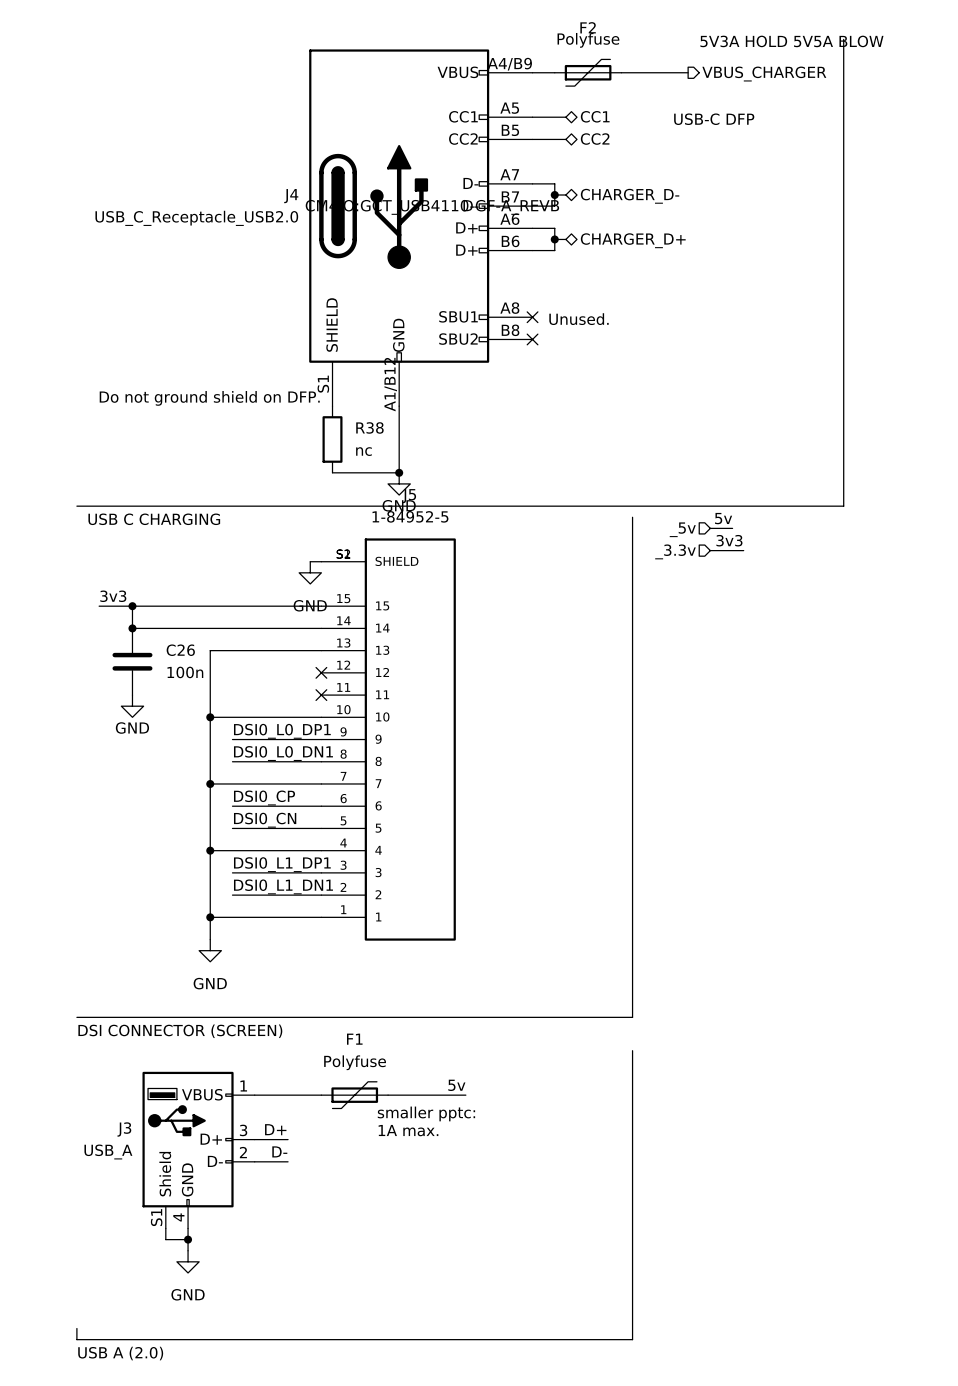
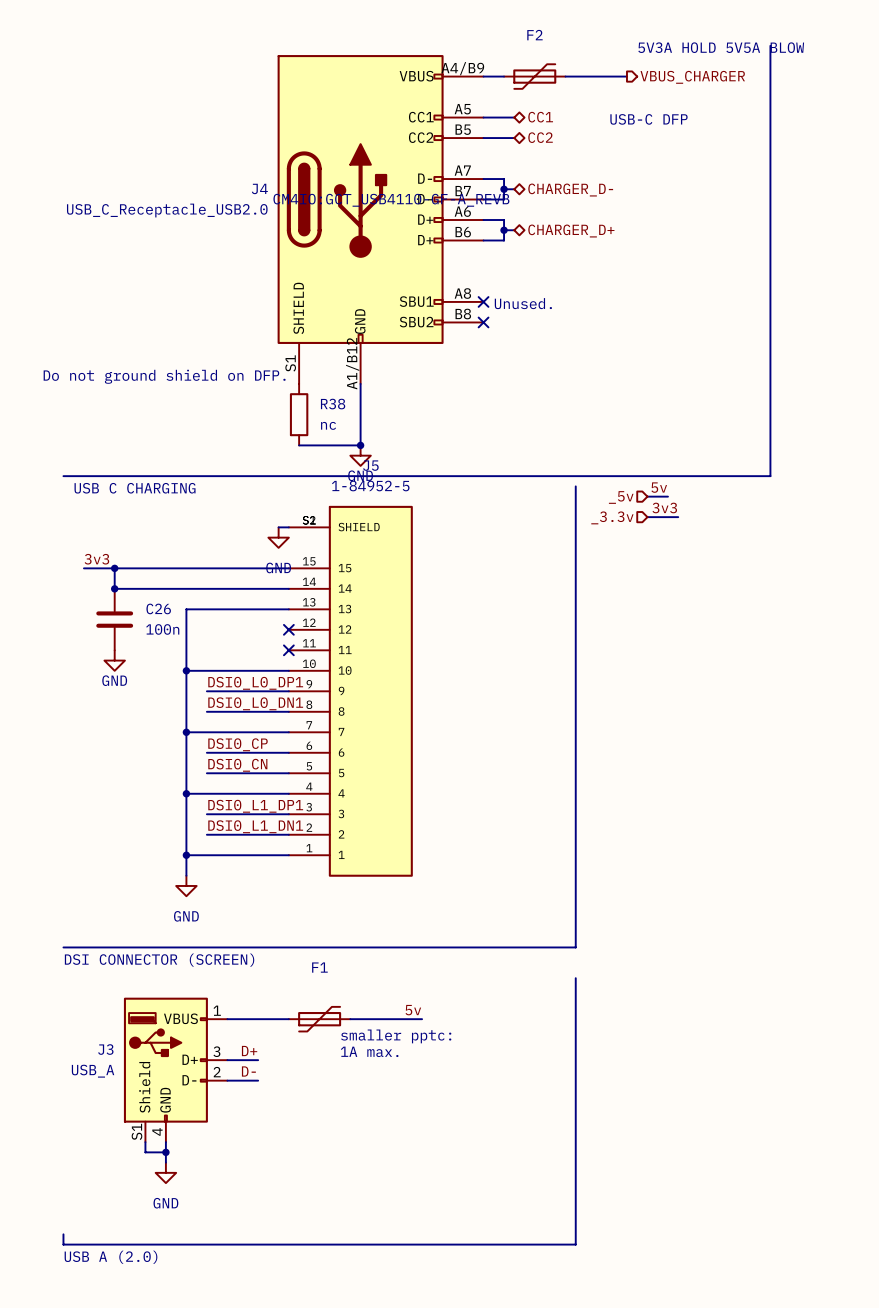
F2 value: Polyfuse (588, 40) -> none
F1 value: Polyfuse (355, 1062) -> none

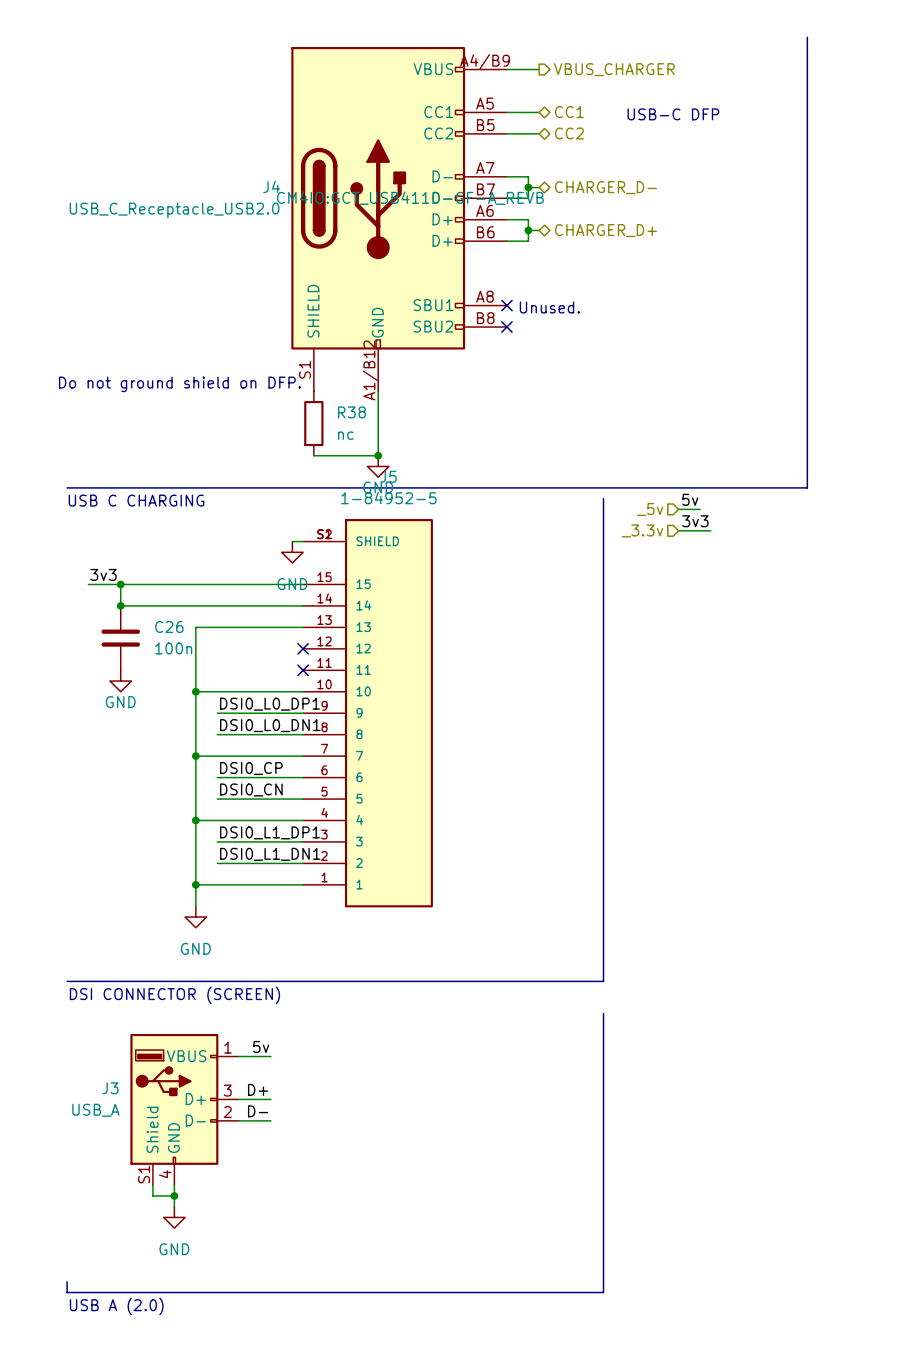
text: 5V3A HOLD 5V5A BLOW (721, 47) -> none
F2: (534, 76) -> none
wire: (565, 76) (626, 76) -> none
hierarchical label position: VBUS_CHARGER (692, 77) -> VBUS_CHARGER (614, 69)
label position: 5v (413, 1010) -> 5v (261, 1046)
wire: (258, 1019) (288, 1019) -> none
F1: (319, 1019) -> none
wire: (350, 1019) (422, 1019) -> none
text: smaller pptc: (396, 1036) -> none
text: 1A max. (369, 1051) -> none

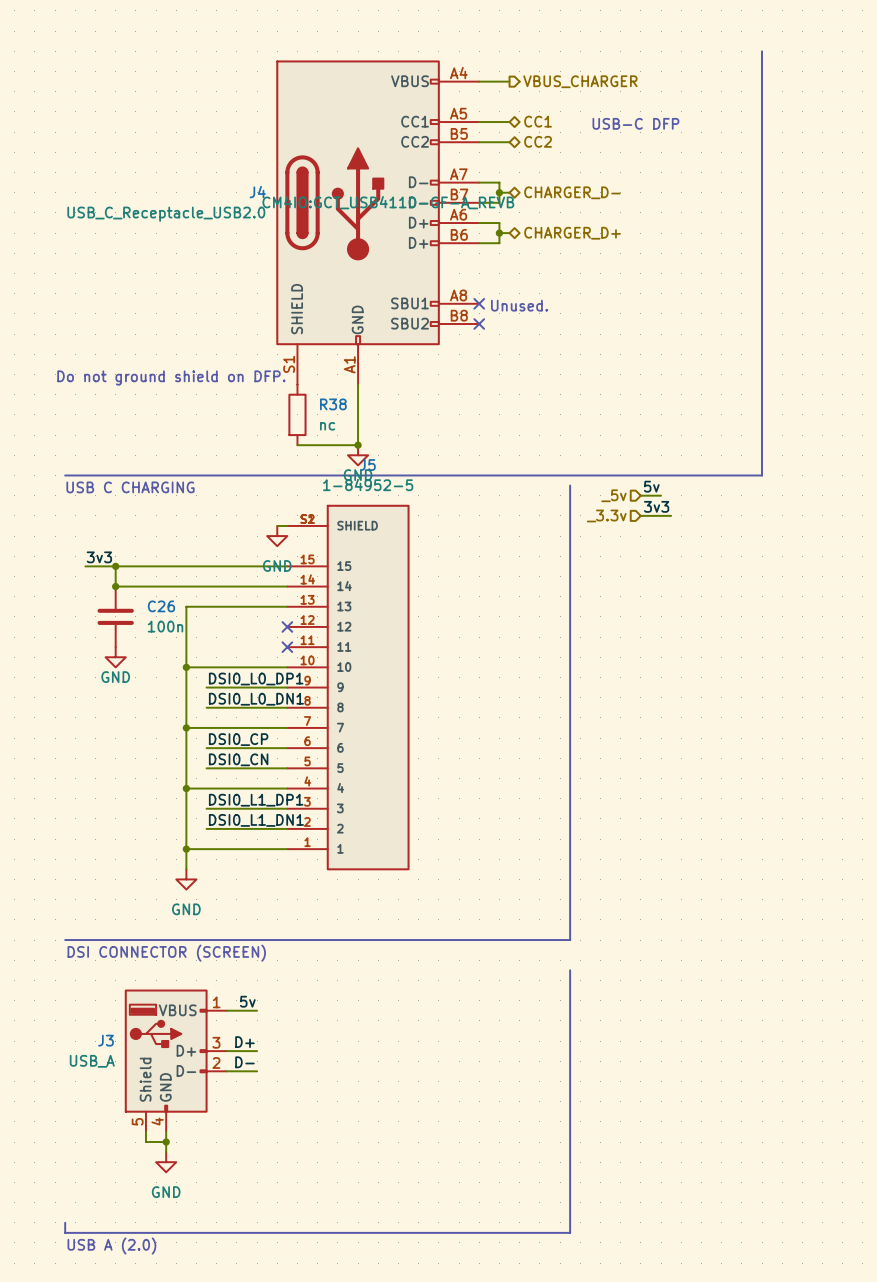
J4 pin number: A4/B9 (484, 61) -> A4 (458, 73)
J4 pin number: A1/B12 (370, 370) -> A1 (349, 364)
J3 pin number: S1 (144, 1174) -> 5 (137, 1121)

